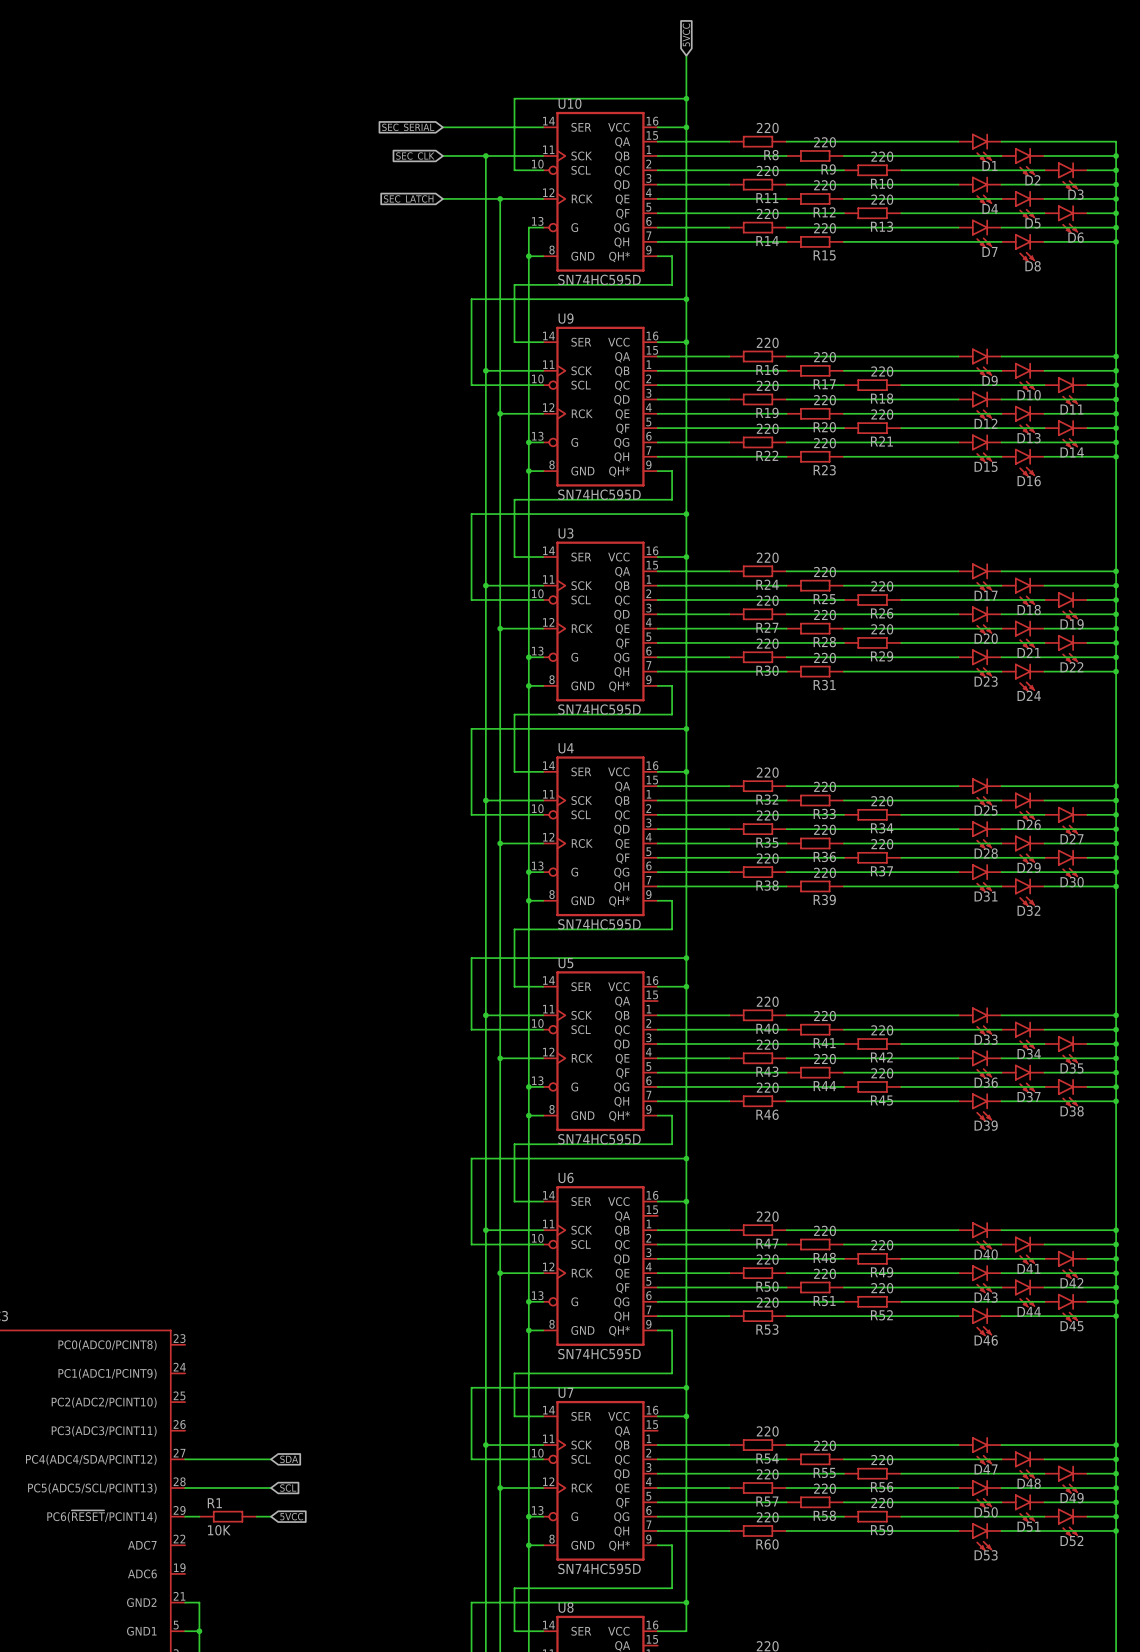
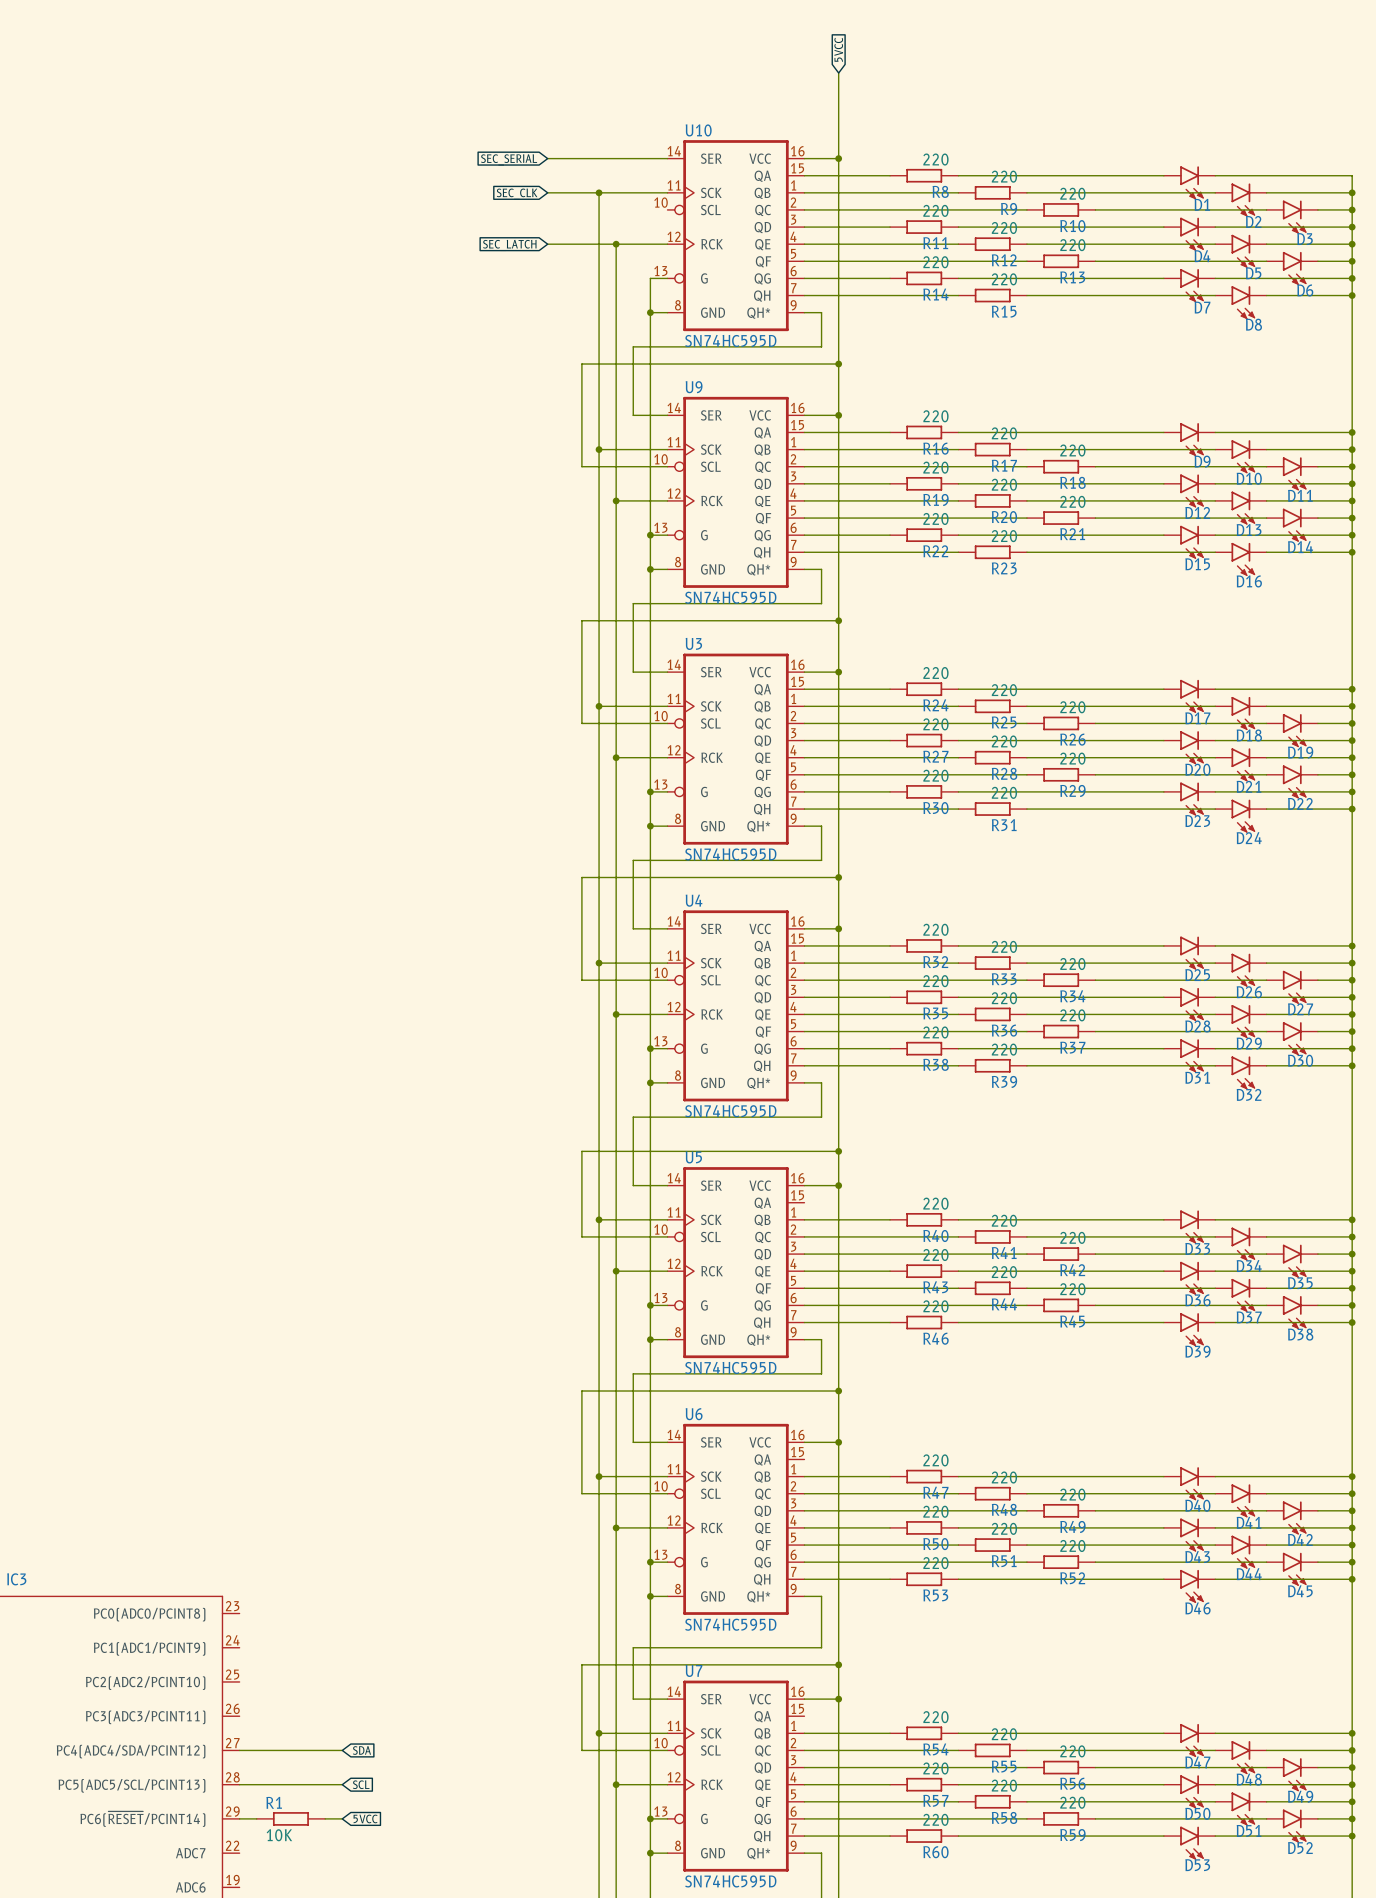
wire: (686, 98) (514, 98) (514, 170) (543, 170) -> none
junction: (686, 98) -> none

